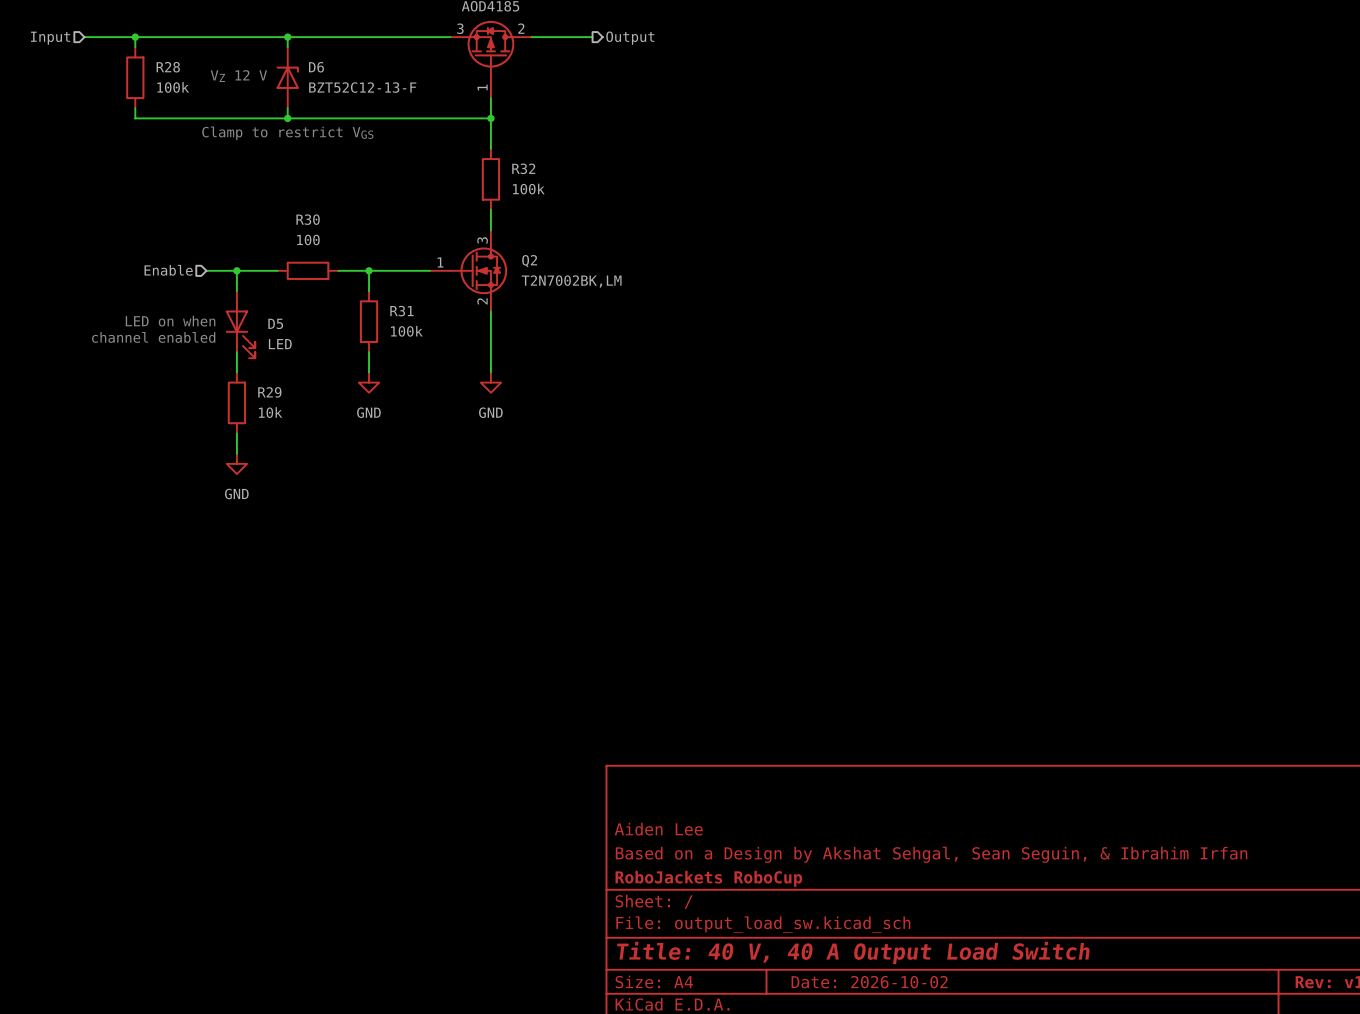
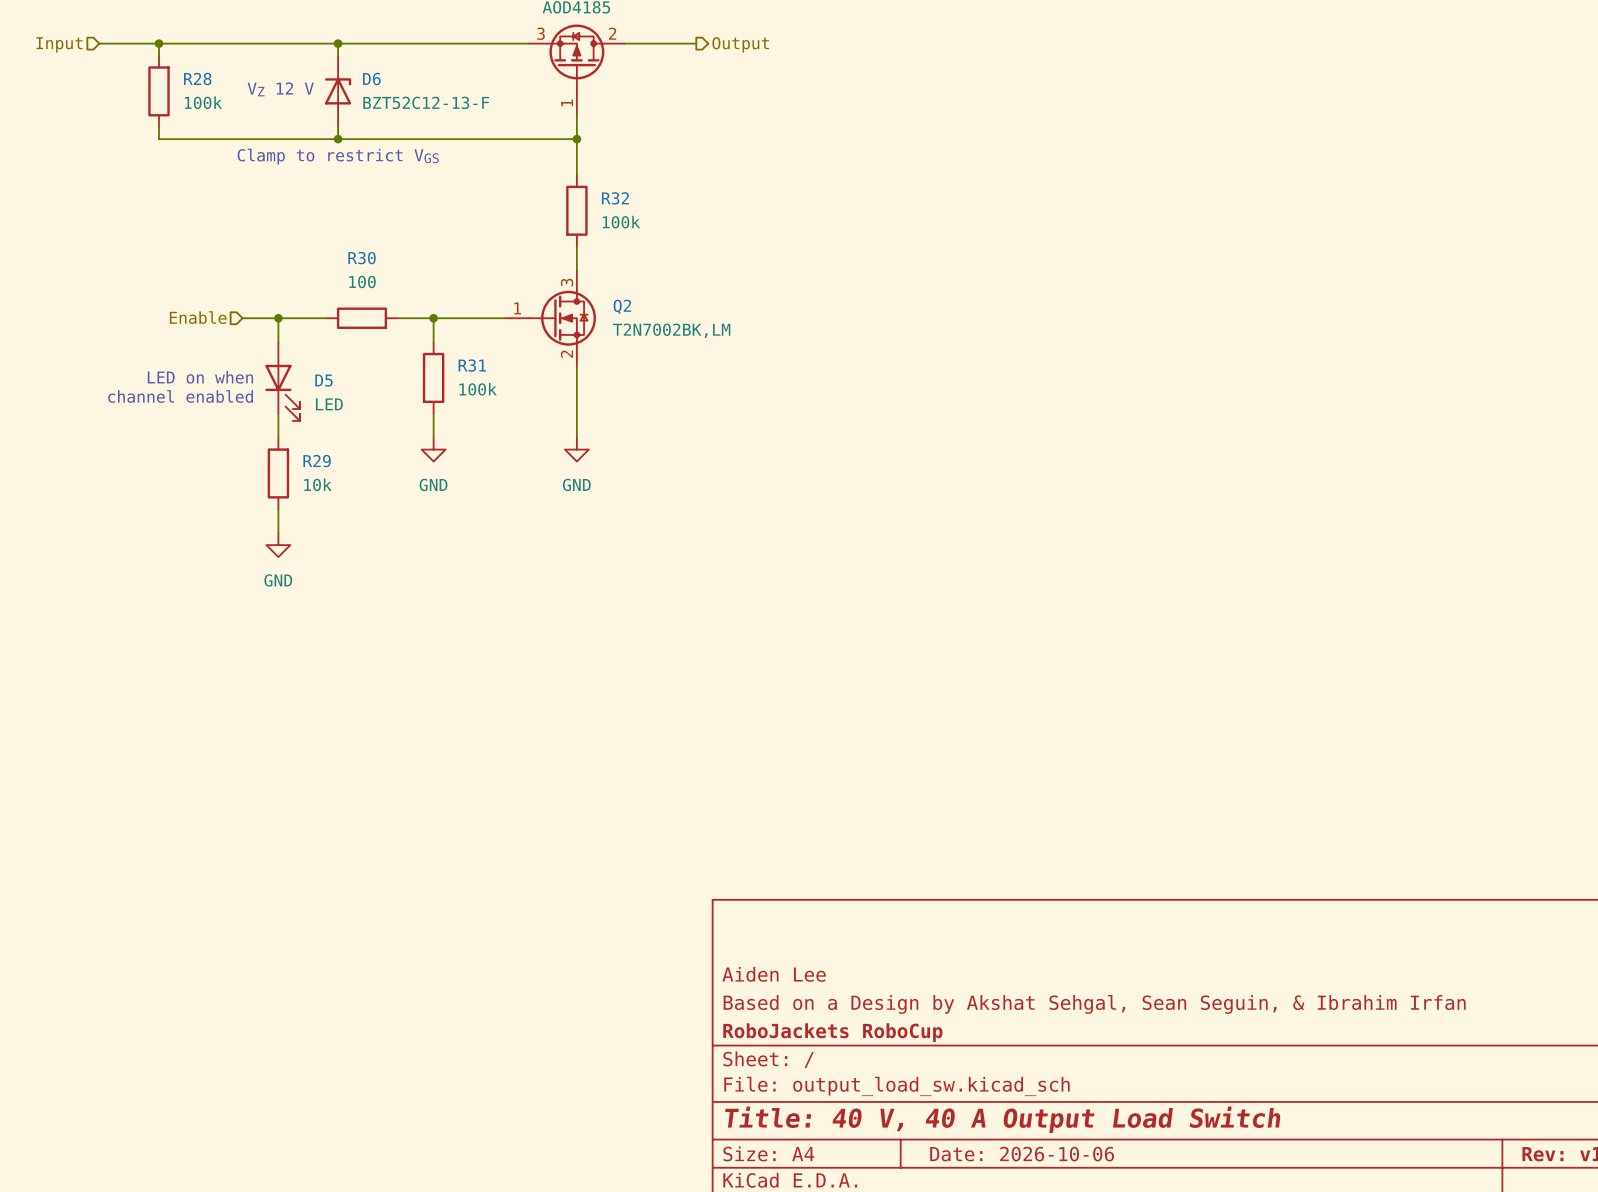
title block: Date: 2026-10-02 (869, 982) -> Date: 2026-10-06 (1022, 1154)

